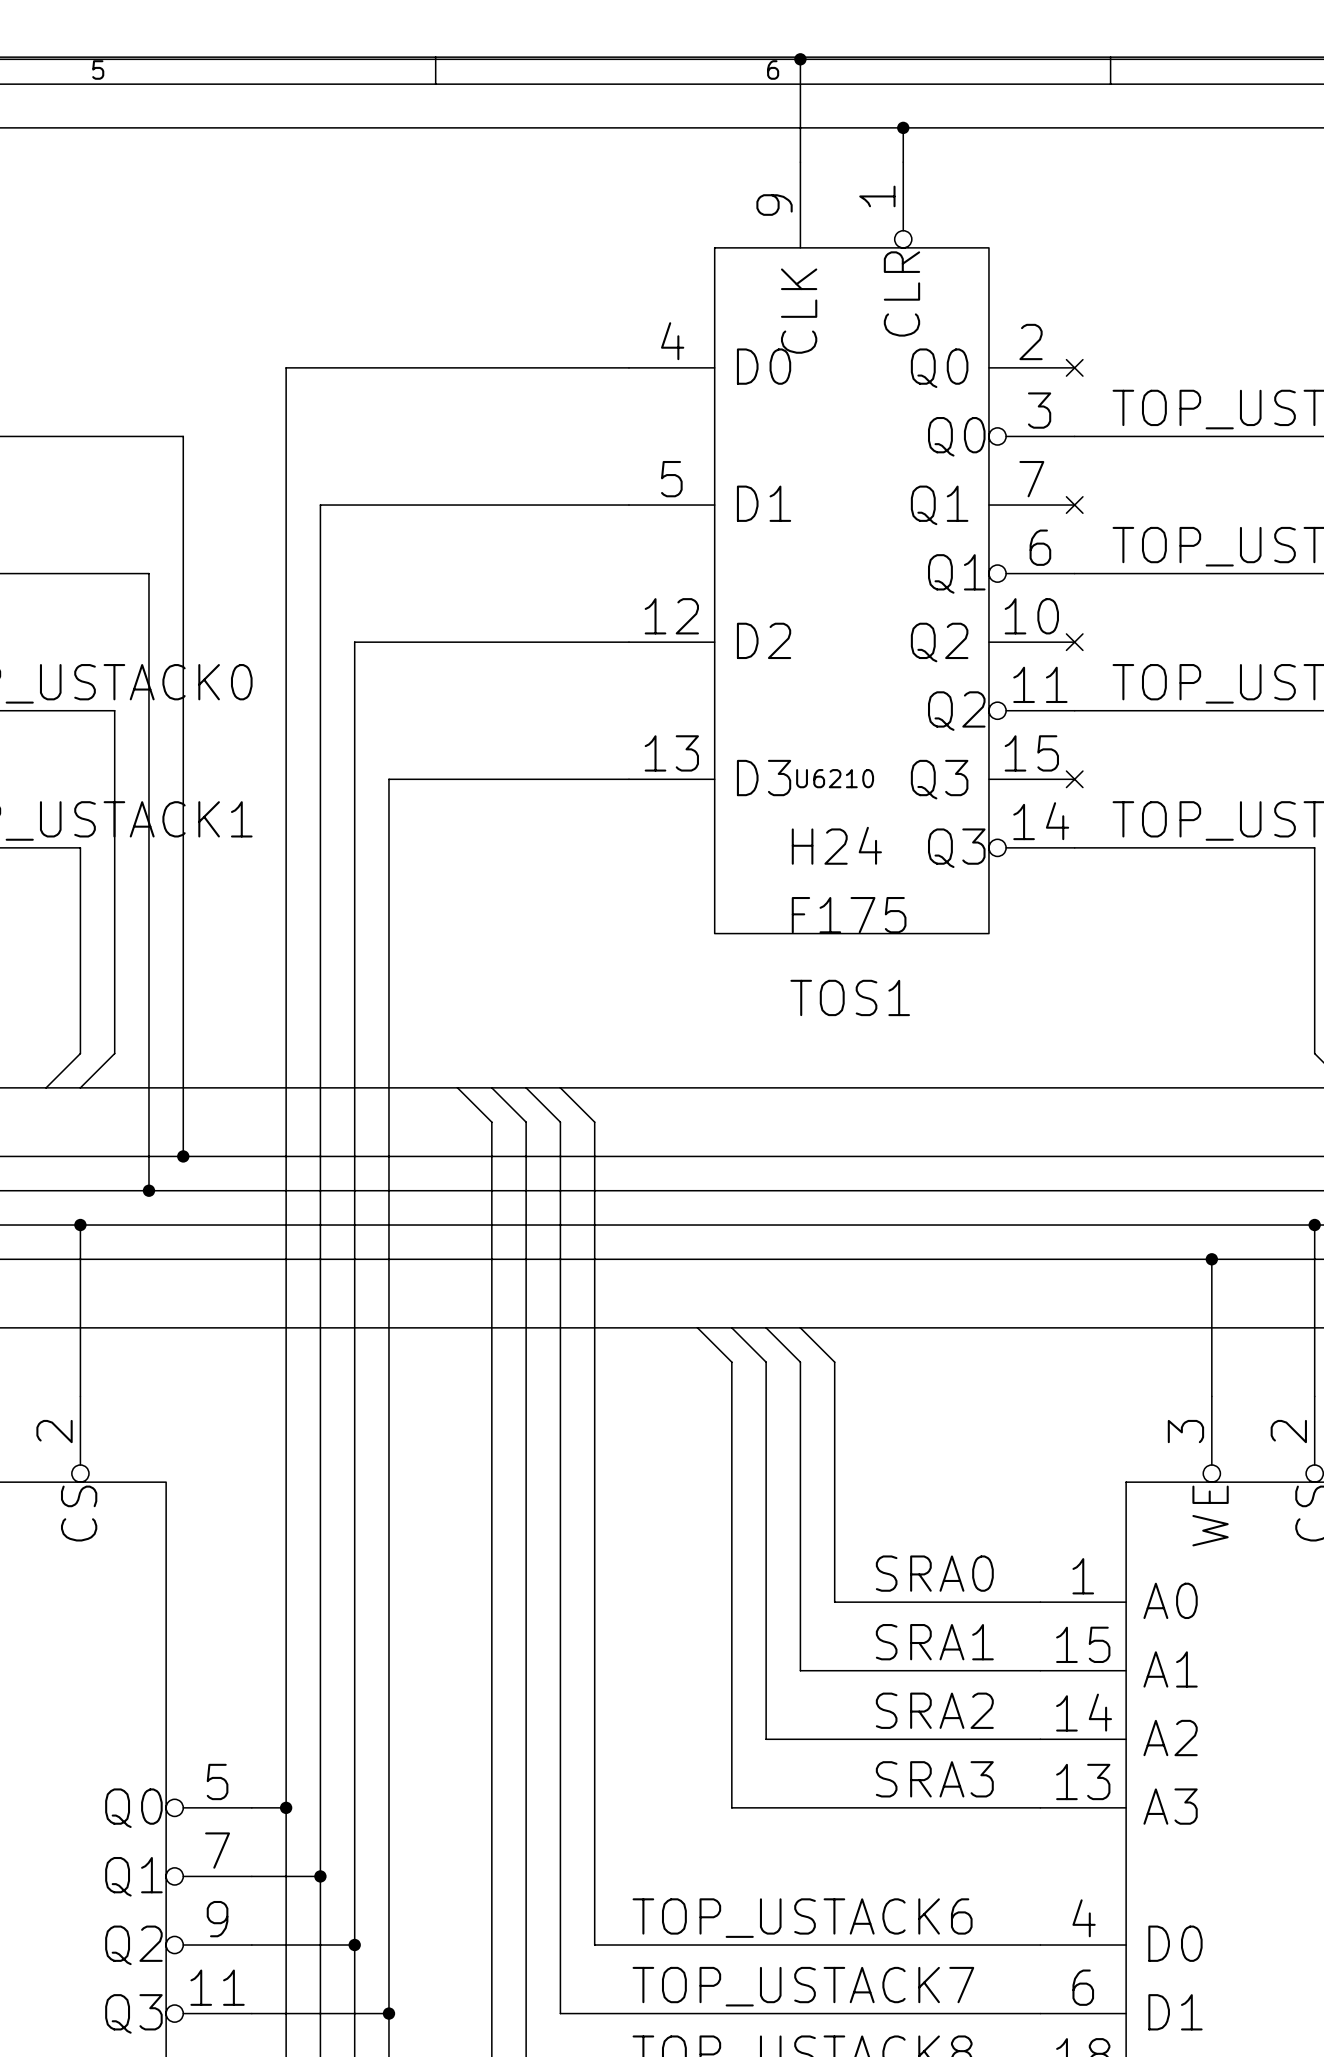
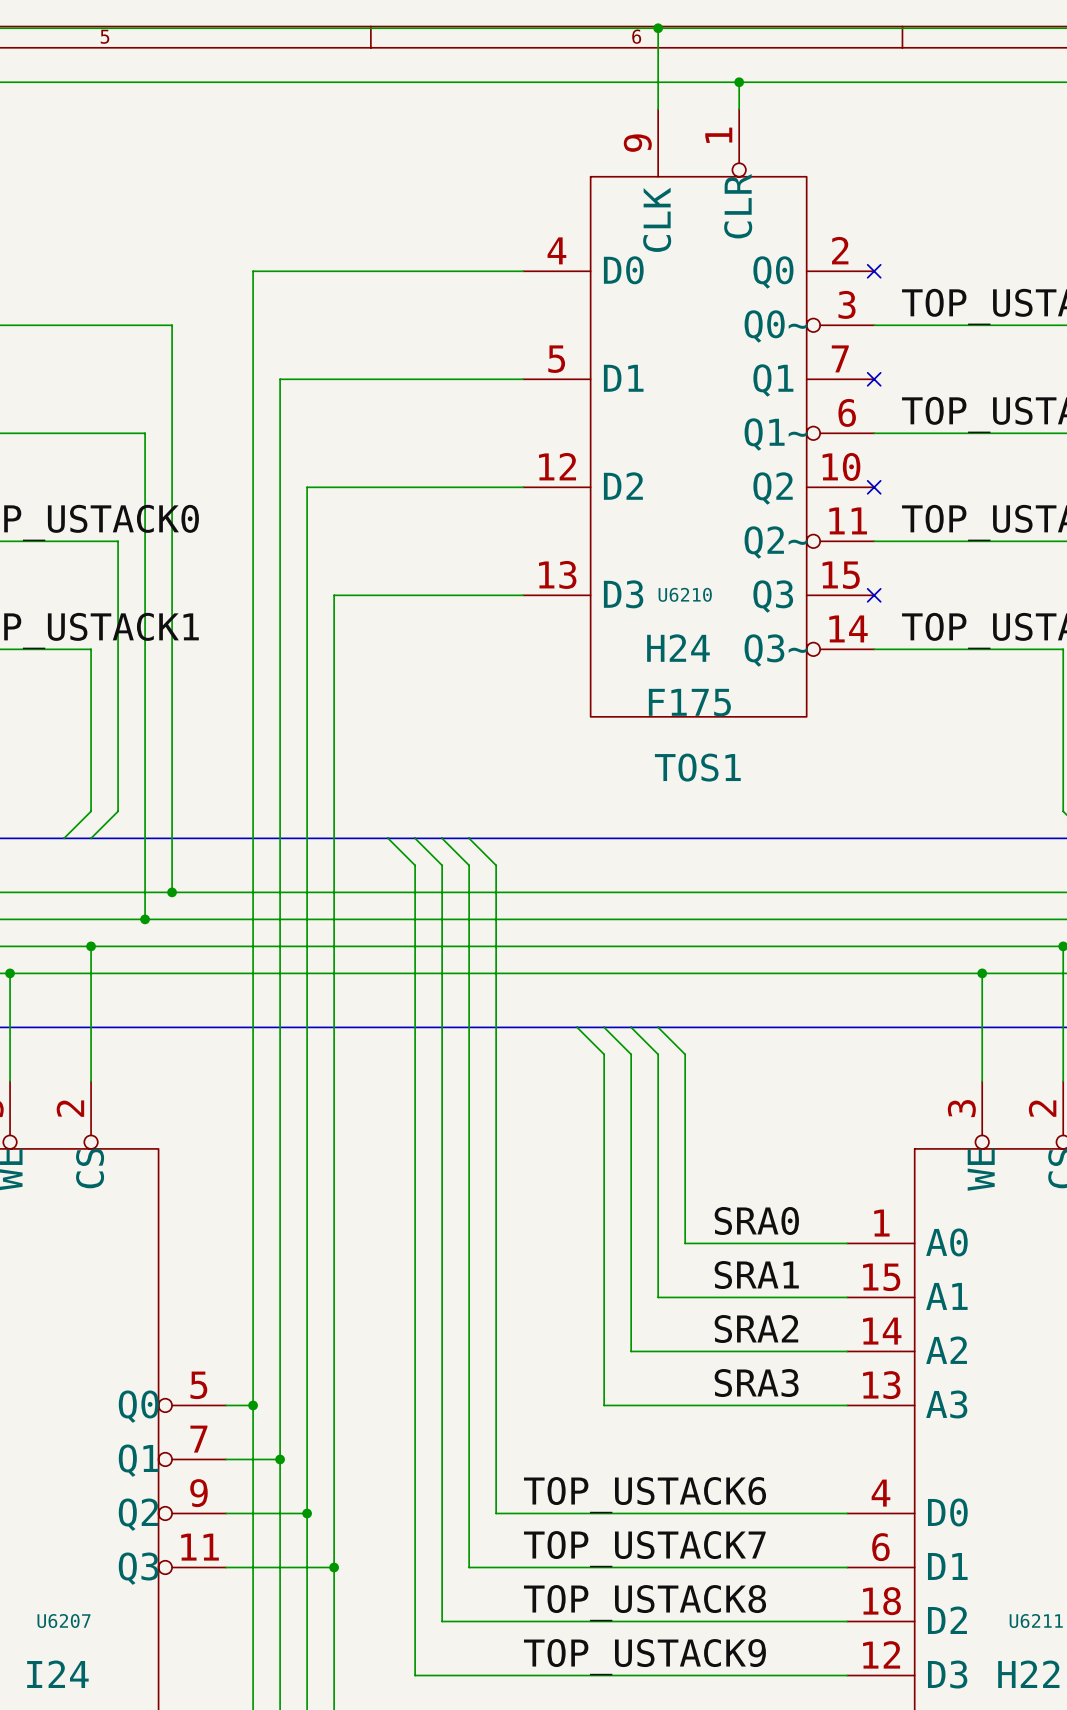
U6210 pin name: Q0 (956, 436) -> Q0~ (776, 326)
U6210 pin name: Q1 (956, 573) -> Q1~ (776, 434)
U6210 pin name: Q2 (956, 711) -> Q2~ (776, 542)
U6210 pin name: Q3 (956, 848) -> Q3~ (776, 650)

